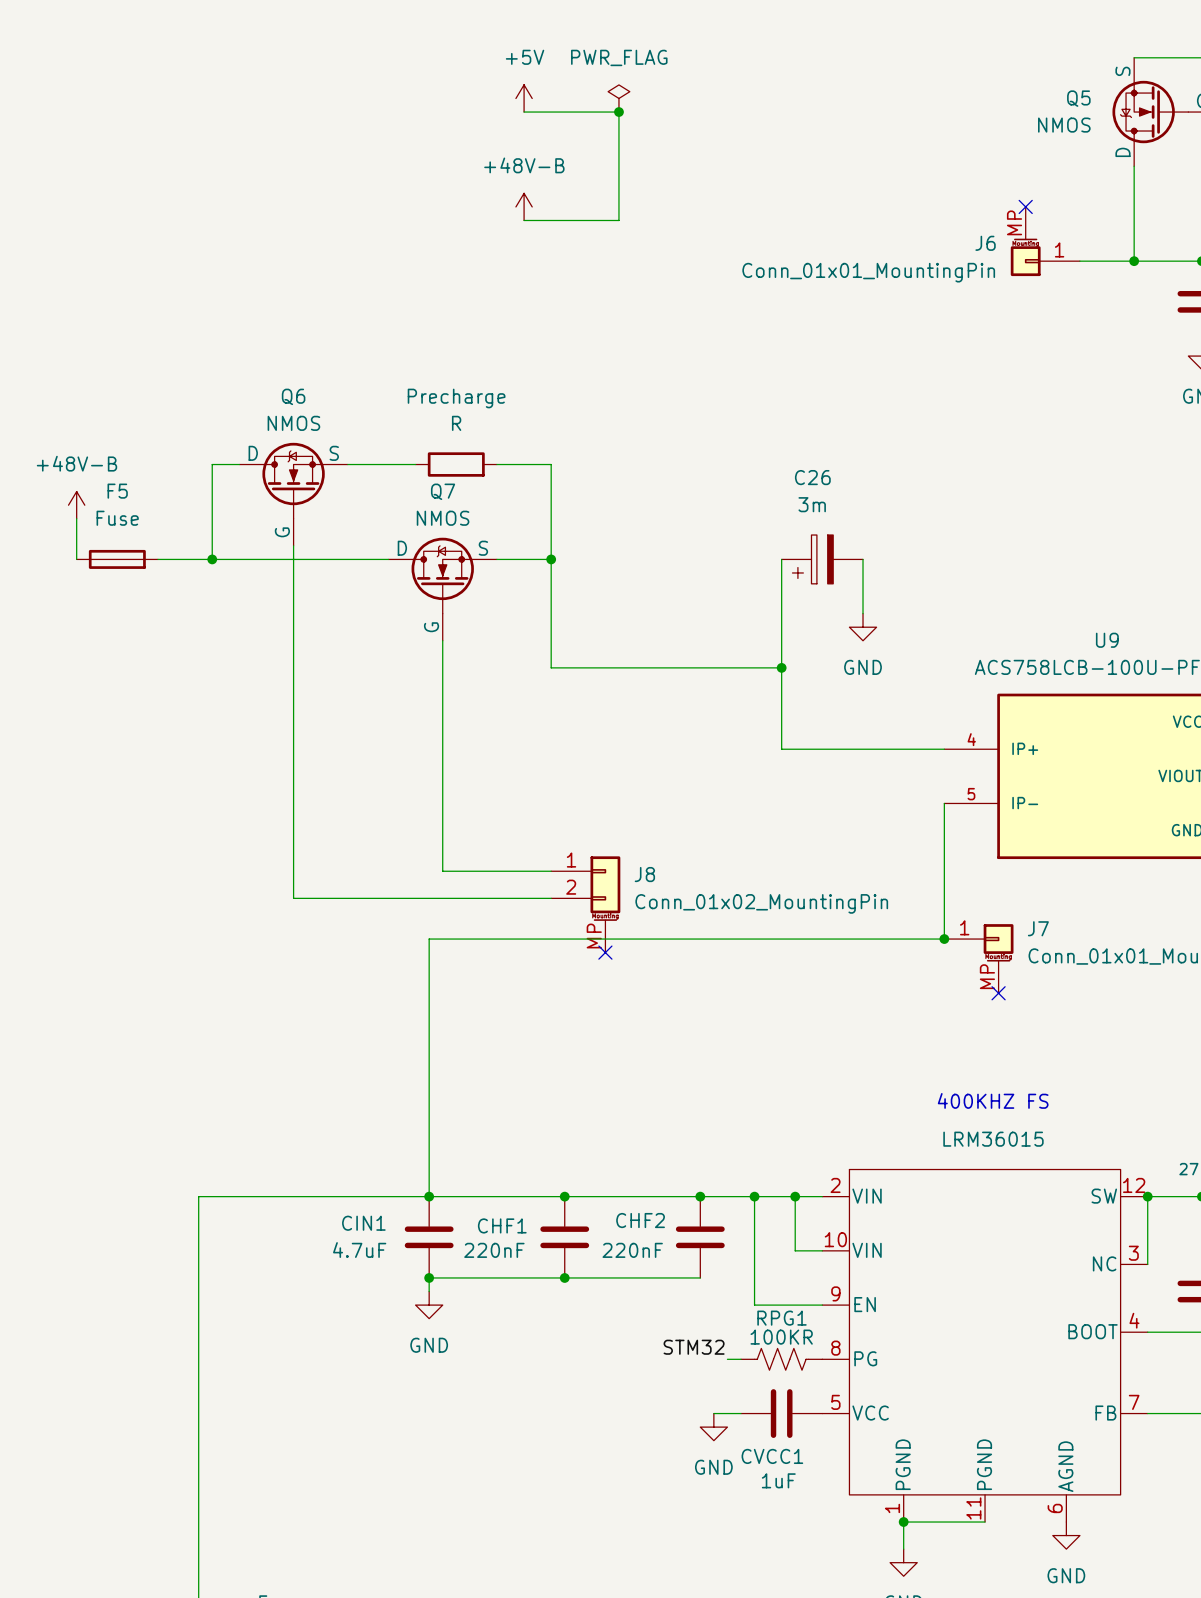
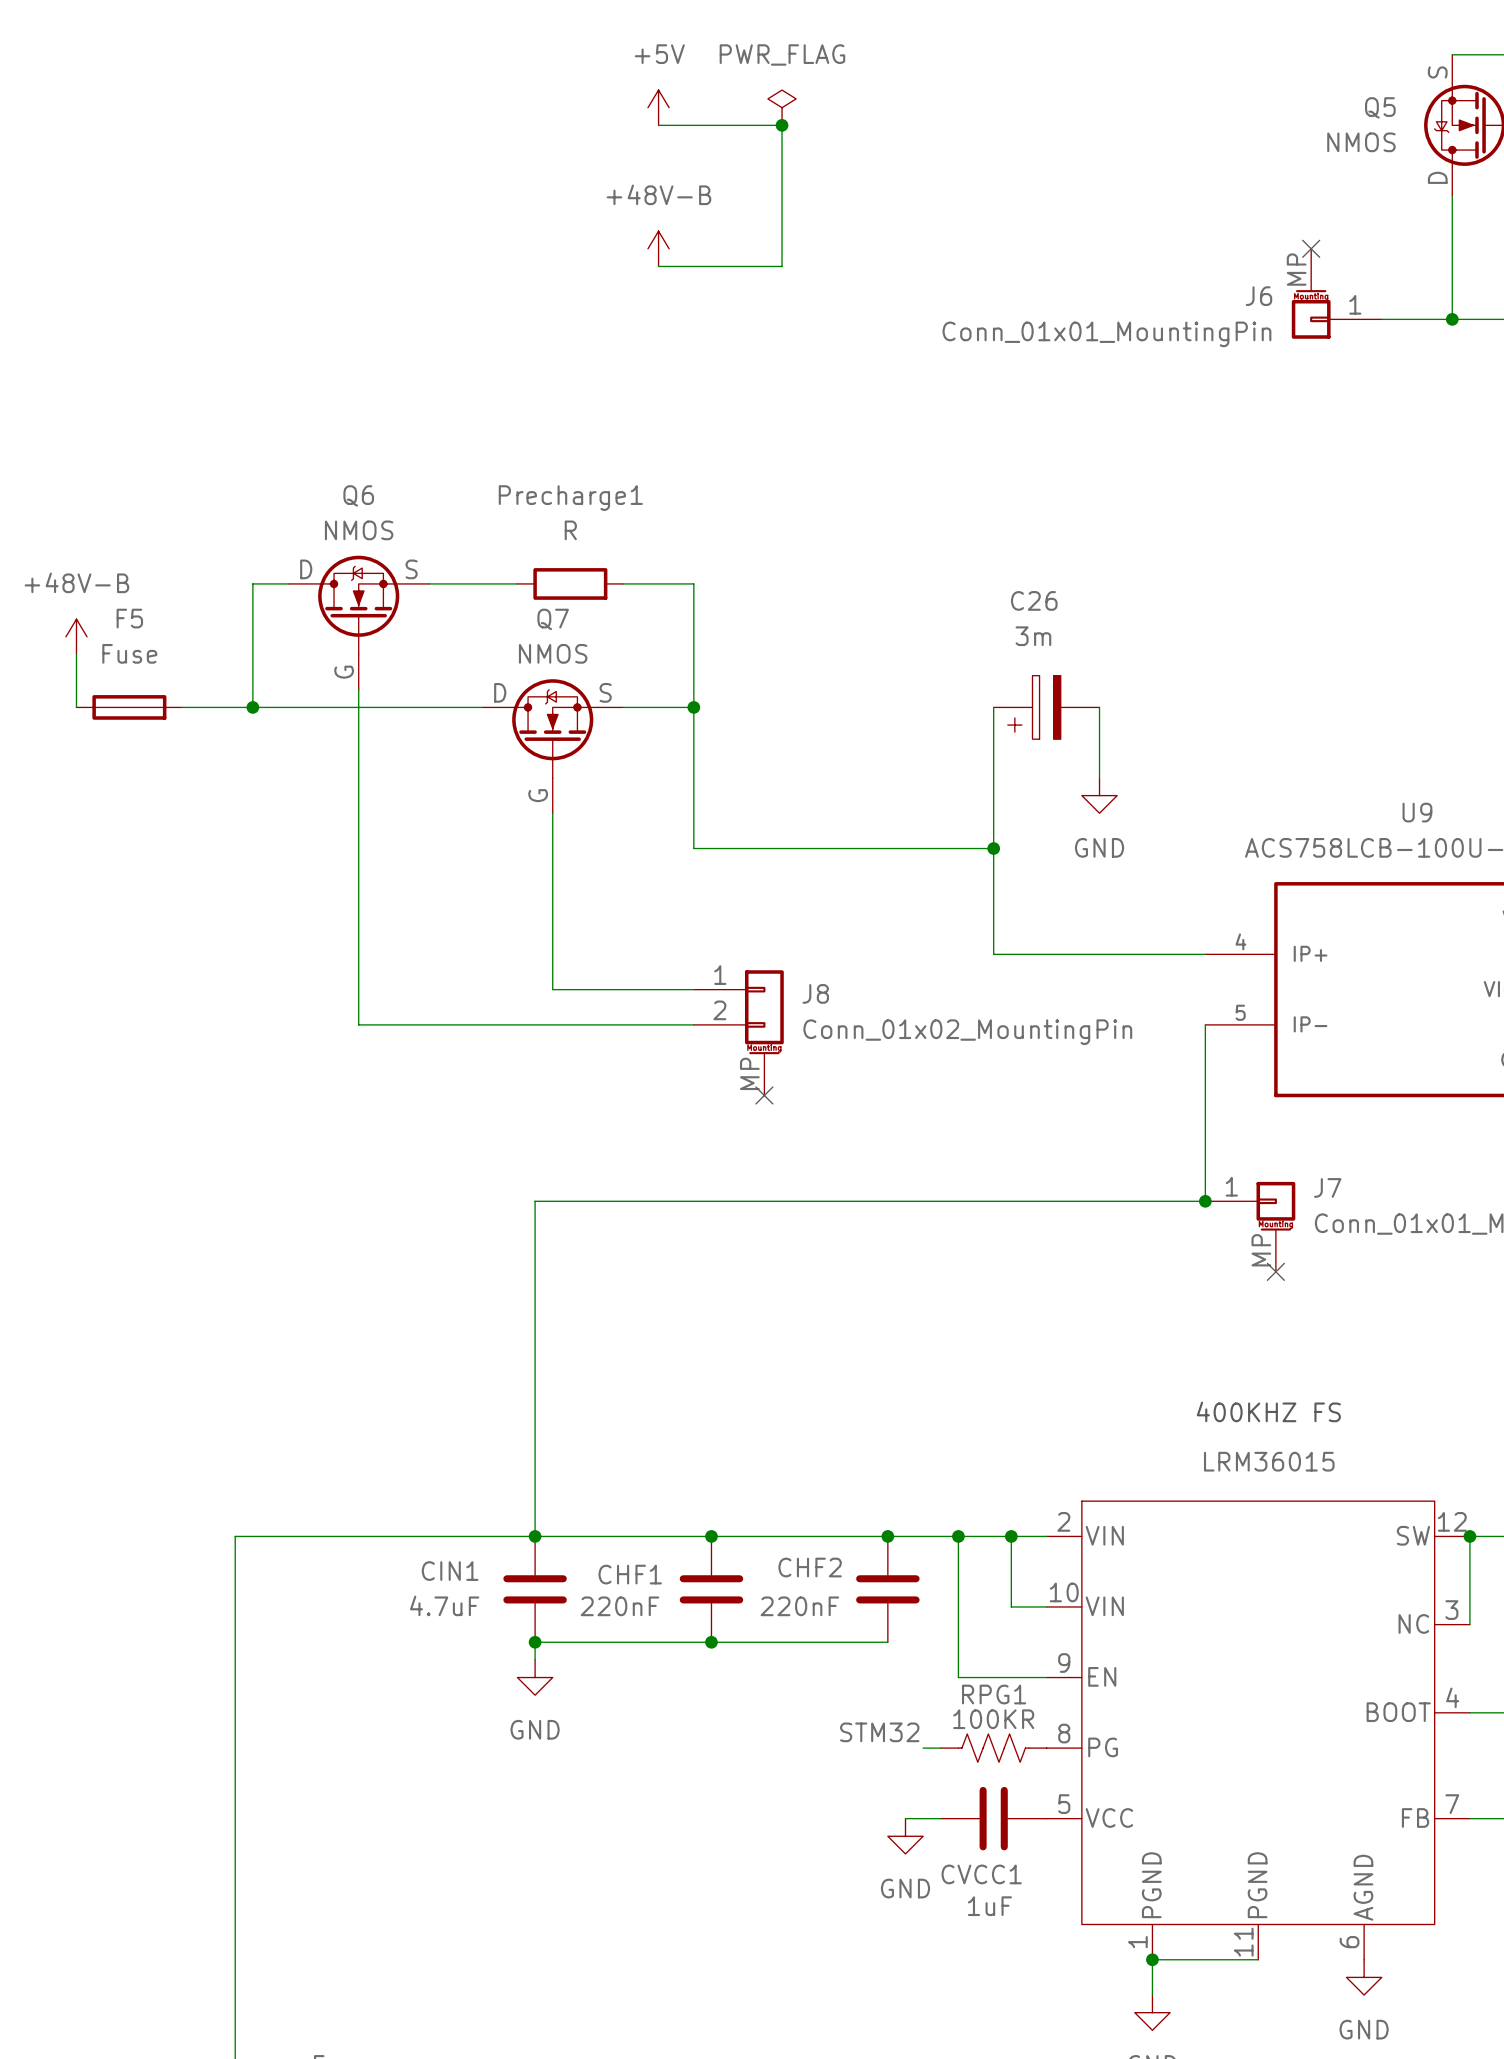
Precharge name: Precharge (456, 398) -> Precharge1 (570, 498)
wire: (442, 776) (442, 871) (551, 871) -> (552, 989) (693, 989)
wire: (293, 803) (293, 898) (551, 898) -> (358, 1024) (693, 1024)
no-connect mark: none -> (764, 1095)
J8 position: (585, 904) -> (738, 1032)
no-connect mark: (605, 952) -> none

